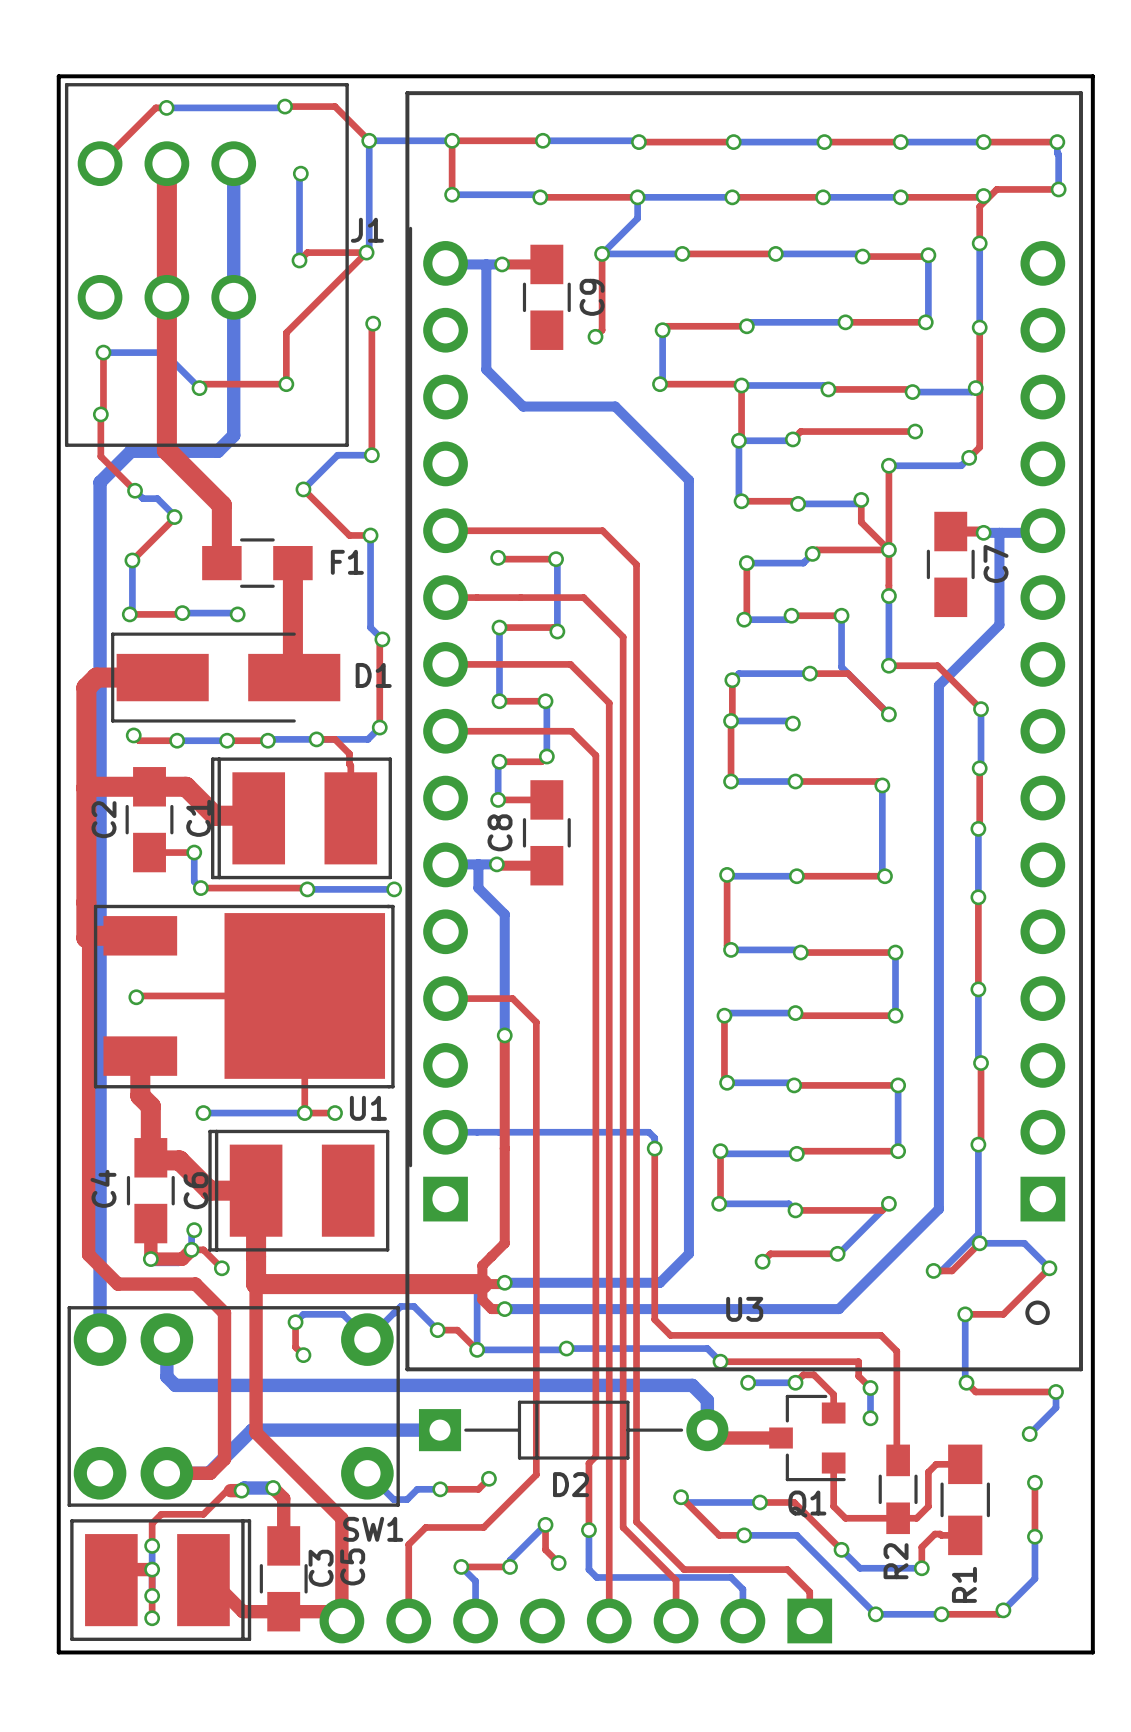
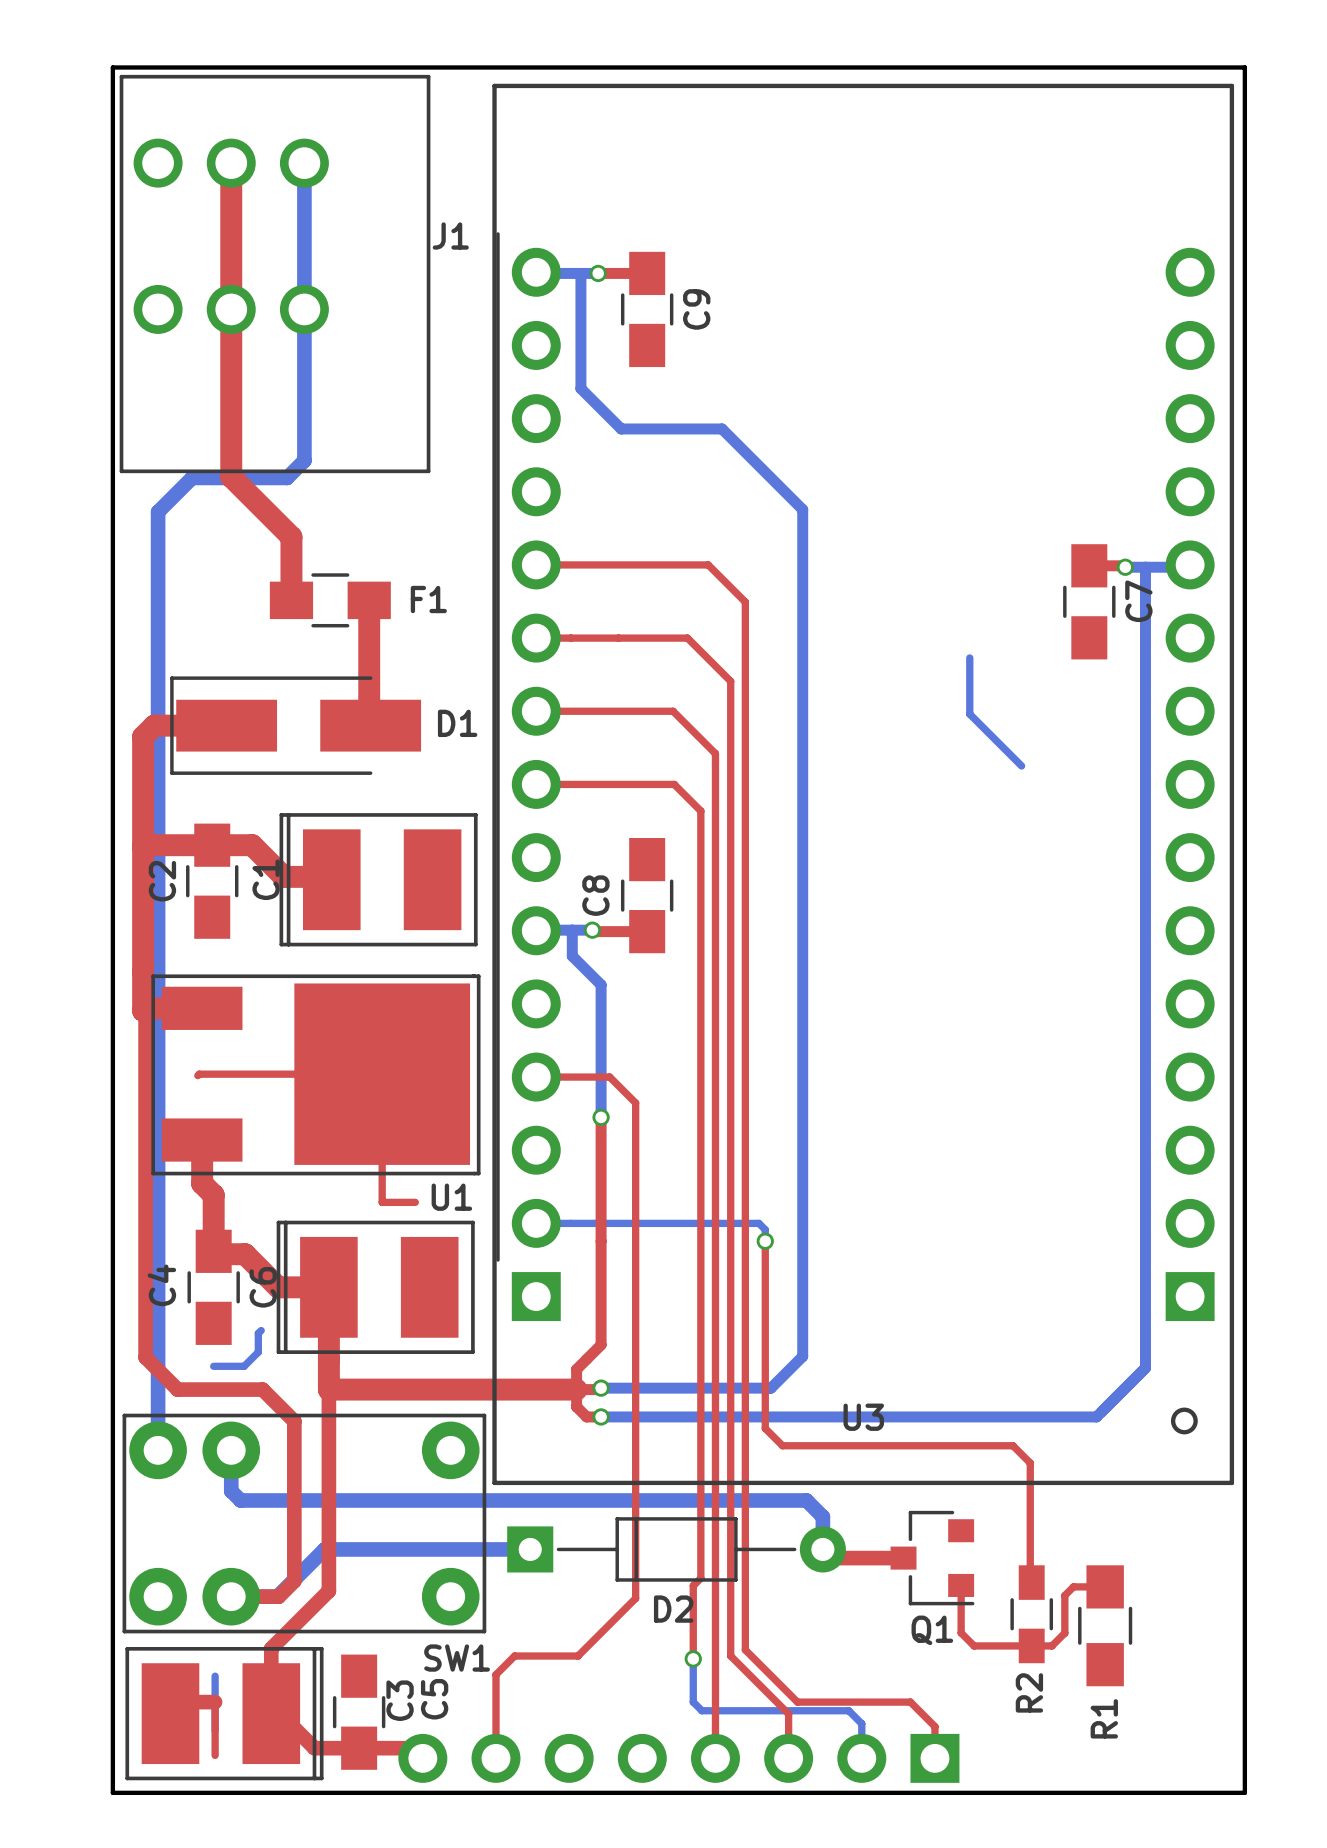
bottom track: (285, 106) (166, 107) -> none
top track: (285, 106) (335, 106) (369, 140) -> none
via: (285, 106) -> none
top track: (166, 107) (155, 107) (100, 163) -> none
via: (166, 107) -> none
via: (369, 140) -> none
bottom track: (452, 140) (369, 140) (369, 249) (366, 252) -> none
via: (452, 140) -> none
bottom track: (542, 140) (638, 142) -> none
top track: (542, 140) (452, 140) (452, 194) -> none
via: (542, 140) -> none
top track: (638, 142) (733, 142) -> none
via: (638, 142) -> none
bottom track: (733, 142) (824, 142) -> none
via: (733, 142) -> none
top track: (824, 142) (900, 142) -> none
via: (824, 142) -> none
bottom track: (900, 142) (983, 142) -> none
via: (900, 142) -> none
top track: (983, 142) (1057, 142) -> none
via: (983, 142) -> none
bottom track: (1057, 142) (1058, 189) -> none
via: (1057, 142) -> none
bottom track: (300, 173) (299, 260) -> none
via: (300, 173) -> none
top track: (1058, 189) (996, 189) (979, 206) (979, 243) -> none
via: (1058, 189) -> none
bottom track: (452, 194) (537, 194) (540, 197) -> none
via: (452, 194) -> none
top track: (983, 196) (900, 197) -> none
via: (983, 196) -> none
top track: (540, 197) (637, 197) -> none
via: (540, 197) -> none
via: (637, 197) -> none
bottom track: (732, 197) (637, 197) (637, 218) (602, 253) (682, 253) -> none
top track: (732, 197) (823, 197) -> none
via: (732, 197) -> none
bottom track: (823, 197) (900, 197) -> none
via: (823, 197) -> none
via: (900, 197) -> none
bottom track: (979, 243) (979, 327) -> none
via: (979, 243) -> none
via: (366, 252) -> none
top track: (602, 253) (602, 330) (595, 336) -> none
via: (602, 253) -> none
top track: (682, 253) (775, 253) -> none
via: (682, 253) -> none
bottom track: (775, 253) (859, 253) (862, 256) -> none
via: (775, 253) -> none
bottom track: (928, 255) (928, 319) (925, 322) -> none
top track: (928, 255) (862, 256) -> none
via: (928, 255) -> none
via: (862, 256) -> none
top track: (299, 260) (307, 252) (366, 252) (286, 332) (286, 384) (203, 384) (199, 388) -> none
via: (299, 260) -> none
bottom track: (845, 322) (750, 322) (746, 326) -> none
top track: (845, 322) (925, 322) -> none
via: (845, 322) -> none
via: (925, 322) -> none
top track: (373, 323) (371, 455) -> none
via: (373, 323) -> none
top track: (746, 326) (666, 326) (662, 330) -> none
via: (746, 326) -> none
top track: (979, 327) (979, 447) (969, 457) -> none
via: (979, 327) -> none
bottom track: (662, 330) (662, 381) (659, 384) -> none
via: (662, 330) -> none
via: (595, 336) -> none
bottom track: (103, 352) (163, 352) (199, 388) -> none
top track: (103, 352) (100, 456) (135, 490) -> none
via: (103, 352) -> none
via: (286, 384) -> none
top track: (659, 384) (740, 384) (741, 438) (738, 440) -> none
via: (659, 384) -> none
bottom track: (741, 385) (824, 385) (828, 389) -> none
via: (741, 385) -> none
via: (199, 388) -> none
bottom track: (975, 388) (971, 392) (912, 392) -> none
via: (975, 388) -> none
top track: (828, 389) (909, 389) (912, 392) -> none
via: (828, 389) -> none
via: (912, 392) -> none
via: (100, 414) -> none
top track: (915, 431) (800, 431) (792, 439) -> none
via: (915, 431) -> none
bottom track: (792, 439) (738, 440) (738, 498) (741, 501) -> none
via: (792, 439) -> none
via: (738, 440) -> none
bottom track: (371, 455) (337, 455) (303, 489) -> none
via: (371, 455) -> none
bottom track: (969, 457) (961, 465) (888, 465) -> none
via: (969, 457) -> none
top track: (888, 465) (888, 595) -> none
via: (888, 465) -> none
top track: (303, 489) (349, 535) (370, 535) -> none
via: (303, 489) -> none
bottom track: (135, 490) (142, 498) (157, 498) (174, 517) -> none
via: (135, 490) -> none
bottom track: (861, 499) (857, 503) (798, 503) -> none
top track: (861, 499) (861, 522) (888, 549) (816, 549) (812, 553) -> none
via: (861, 499) -> none
top track: (741, 501) (795, 501) (798, 503) -> none
via: (741, 501) -> none
via: (798, 503) -> none
top track: (174, 517) (132, 560) -> none
via: (174, 517) -> none
bottom track: (999, 532) (999, 624) (938, 685) (938, 1209) (838, 1309) -> (1145, 567) (1145, 1367) (1096, 1416) (966, 1416)
bottom track: (370, 535) (370, 627) (382, 639) -> none
via: (370, 535) -> none
via: (888, 549) -> none
bottom track: (812, 553) (803, 563) (746, 563) -> none
via: (812, 553) -> none
top track: (498, 557) (556, 559) -> none
via: (498, 557) -> none
bottom track: (556, 559) (557, 631) -> none
via: (556, 559) -> none
bottom track: (132, 560) (132, 611) (129, 614) -> none
via: (132, 560) -> none
top track: (746, 563) (746, 617) (744, 619) -> none
via: (746, 563) -> none
bottom track: (888, 595) (888, 665) -> none
via: (888, 595) -> none
bottom track: (182, 613) (237, 614) -> none
top track: (182, 613) (129, 614) -> none
via: (182, 613) -> none
via: (129, 614) -> none
via: (237, 614) -> none
bottom track: (791, 615) (787, 619) (744, 619) -> none
top track: (791, 615) (841, 615) -> none
via: (791, 615) -> none
via: (841, 615) -> none
via: (744, 619) -> none
bottom track: (499, 627) (499, 701) -> none
top track: (499, 627) (553, 627) (557, 631) -> none
via: (499, 627) -> none
via: (557, 631) -> none
top track: (382, 639) (379, 642) (379, 727) -> none
via: (382, 639) -> none
top track: (888, 665) (937, 665) (981, 709) -> none
via: (888, 665) -> none
bottom track: (809, 673) (738, 673) (732, 680) -> none
top track: (809, 673) (848, 673) (888, 714) -> none
via: (809, 673) -> none
top track: (732, 680) (731, 781) -> none
via: (732, 680) -> none
top track: (499, 701) (545, 701) -> none
via: (499, 701) -> none
bottom track: (545, 701) (546, 756) -> none
via: (545, 701) -> none
bottom track: (981, 709) (979, 768) -> none
via: (981, 709) -> none
via: (888, 714) -> none
bottom track: (731, 720) (790, 720) (792, 723) -> none
via: (731, 720) -> none
via: (792, 723) -> none
bottom track: (379, 727) (367, 739) (267, 740) -> none
via: (379, 727) -> none
top track: (133, 735) (138, 740) (177, 740) -> none
via: (133, 735) -> none
top track: (316, 739) (335, 739) (349, 753) (350, 818) -> none
via: (316, 739) -> none
bottom track: (177, 740) (227, 740) -> none
via: (177, 740) -> none
top track: (227, 740) (267, 740) -> none
via: (227, 740) -> none
via: (267, 740) -> none
top track: (546, 756) (541, 761) (499, 761) -> none
via: (546, 756) -> none
bottom track: (499, 761) (498, 799) -> none
via: (499, 761) -> none
top track: (979, 768) (978, 828) -> none
via: (979, 768) -> none
bottom track: (731, 781) (795, 781) -> none
via: (731, 781) -> none
top track: (795, 781) (878, 781) (882, 785) -> none
via: (795, 781) -> none
bottom track: (882, 785) (882, 873) (884, 876) -> none
via: (882, 785) -> none
top track: (498, 799) (546, 799) -> none
via: (498, 799) -> none
bottom track: (978, 828) (978, 897) -> none
via: (978, 828) -> none
top track: (149, 852) (194, 852) -> none
bottom track: (194, 852) (194, 881) (200, 888) -> none
via: (194, 852) -> none
bottom track: (727, 874) (796, 876) -> none
top track: (727, 874) (727, 945) (731, 949) -> none
via: (727, 874) -> none
top track: (796, 876) (884, 876) -> none
via: (796, 876) -> none
via: (884, 876) -> none
top track: (200, 888) (307, 889) -> none
via: (200, 888) -> none
bottom track: (307, 889) (394, 889) -> none
via: (307, 889) -> none
via: (394, 889) -> none
top track: (978, 897) (978, 989) -> none
via: (978, 897) -> none
bottom track: (731, 949) (798, 949) (800, 952) -> none
via: (731, 949) -> none
top track: (800, 952) (895, 952) -> none
via: (800, 952) -> none
bottom track: (895, 952) (895, 1015) -> none
via: (895, 952) -> none
bottom track: (978, 989) (978, 1060) (981, 1063) -> none
via: (978, 989) -> none
via: (136, 997) -> none
bottom track: (795, 1013) (727, 1013) (724, 1015) -> none
top track: (795, 1013) (798, 1015) (895, 1015) -> none
via: (795, 1013) -> none
top track: (724, 1015) (724, 1080) (727, 1082) -> none
via: (724, 1015) -> none
via: (895, 1015) -> none
top track: (981, 1063) (981, 1141) (978, 1144) -> none
via: (981, 1063) -> none
bottom track: (727, 1082) (791, 1082) (794, 1085) -> none
via: (727, 1082) -> none
top track: (794, 1085) (898, 1085) -> none
via: (794, 1085) -> none
bottom track: (898, 1085) (898, 1151) -> none
via: (898, 1085) -> none
bottom track: (203, 1113) (304, 1113) -> none
via: (203, 1113) -> none
via: (304, 1113) -> none
via: (335, 1113) -> none
bottom track: (978, 1144) (978, 1234) (941, 1270) (933, 1270) -> none
via: (978, 1144) -> none
bottom track: (720, 1151) (723, 1153) (796, 1153) -> none
top track: (720, 1151) (719, 1203) -> none
via: (720, 1151) -> none
top track: (898, 1151) (799, 1151) (796, 1153) -> none
via: (898, 1151) -> none
via: (796, 1153) -> none
bottom track: (719, 1203) (788, 1203) (795, 1210) -> none
via: (719, 1203) -> none
bottom track: (888, 1203) (837, 1253) -> none
top track: (888, 1203) (882, 1210) (795, 1210) -> none
via: (888, 1203) -> none
via: (795, 1210) -> none
top track: (150, 1223) (150, 1259) (182, 1259) (191, 1249) (203, 1249) (221, 1268) -> none
via: (194, 1230) -> none
bottom track: (979, 1243) (1024, 1243) (1049, 1268) -> none
top track: (979, 1243) (952, 1270) (933, 1270) -> none
via: (979, 1243) -> none
via: (191, 1249) -> none
top track: (837, 1253) (770, 1253) (762, 1261) -> none
via: (837, 1253) -> none
via: (150, 1259) -> none
via: (762, 1261) -> none
via: (221, 1268) -> none
top track: (1049, 1268) (1003, 1314) (965, 1314) -> none
via: (1049, 1268) -> none
via: (933, 1270) -> none
bottom track: (477, 1285) (477, 1349) (707, 1348) (720, 1361) -> none
bottom track: (393, 1313) (367, 1339) (342, 1314) (303, 1314) (295, 1322) -> none
bottom track: (393, 1313) (400, 1306) (413, 1306) (437, 1330) -> none
bottom track: (965, 1314) (966, 1382) -> none
via: (965, 1314) -> none
top track: (295, 1322) (295, 1347) (303, 1355) -> none
via: (295, 1322) -> none
top track: (437, 1330) (457, 1330) (477, 1349) -> none
via: (437, 1330) -> none
via: (566, 1348) -> none
via: (477, 1349) -> none
via: (303, 1355) -> none
top track: (720, 1361) (858, 1361) (858, 1376) (870, 1388) -> none
via: (720, 1361) -> none
bottom track: (748, 1382) (795, 1382) -> none
via: (748, 1382) -> none
top track: (795, 1382) (803, 1374) (813, 1374) (833, 1394) (833, 1413) -> none
via: (795, 1382) -> none
top track: (966, 1382) (975, 1391) (1056, 1391) -> none
via: (966, 1382) -> none
bottom track: (870, 1388) (870, 1418) -> none
via: (870, 1388) -> none
bottom track: (1056, 1391) (1056, 1407) (1029, 1434) -> none
via: (1056, 1391) -> none
via: (870, 1418) -> none
top track: (256, 1432) (341, 1518) (341, 1620) -> (328, 1552) (328, 1590) (271, 1648) (271, 1713)
via: (1029, 1434) -> none
bottom track: (367, 1473) (393, 1499) (407, 1499) (417, 1489) (440, 1489) -> none
top track: (488, 1478) (478, 1489) (440, 1489) -> none
via: (488, 1478) -> none
top track: (1034, 1482) (1034, 1536) -> none
via: (1034, 1482) -> none
bottom track: (273, 1488) (244, 1488) (241, 1490) -> none
top track: (273, 1488) (283, 1498) (283, 1545) -> none
via: (273, 1488) -> none
via: (440, 1489) -> none
top track: (241, 1490) (227, 1490) (203, 1514) (161, 1514) (152, 1523) (152, 1545) -> none
via: (241, 1490) -> none
bottom track: (681, 1497) (686, 1502) (759, 1502) -> none
top track: (681, 1497) (719, 1535) (744, 1535) -> none
via: (681, 1497) -> none
top track: (759, 1502) (794, 1502) (841, 1549) -> none
via: (759, 1502) -> none
bottom track: (545, 1524) (510, 1560) (510, 1566) -> none
top track: (545, 1524) (545, 1549) (558, 1563) -> none
via: (545, 1524) -> none
bottom track: (744, 1535) (796, 1535) (875, 1614) (941, 1614) -> none
via: (744, 1535) -> none
top track: (965, 1535) (934, 1534) (921, 1547) (921, 1568) -> none
bottom track: (1034, 1536) (1034, 1578) (1003, 1610) -> none
via: (1034, 1536) -> none
via: (152, 1545) -> none
bottom track: (841, 1549) (859, 1568) (921, 1568) -> none
via: (841, 1549) -> none
via: (558, 1563) -> none
bottom track: (461, 1566) (475, 1581) (475, 1620) -> none
top track: (461, 1566) (510, 1566) -> none
via: (461, 1566) -> none
via: (510, 1566) -> none
via: (921, 1568) -> none
via: (152, 1569) -> none
via: (152, 1595) -> none
top track: (1003, 1610) (999, 1614) (941, 1614) -> none
via: (1003, 1610) -> none
via: (875, 1614) -> none
via: (941, 1614) -> none
via: (152, 1618) -> none

